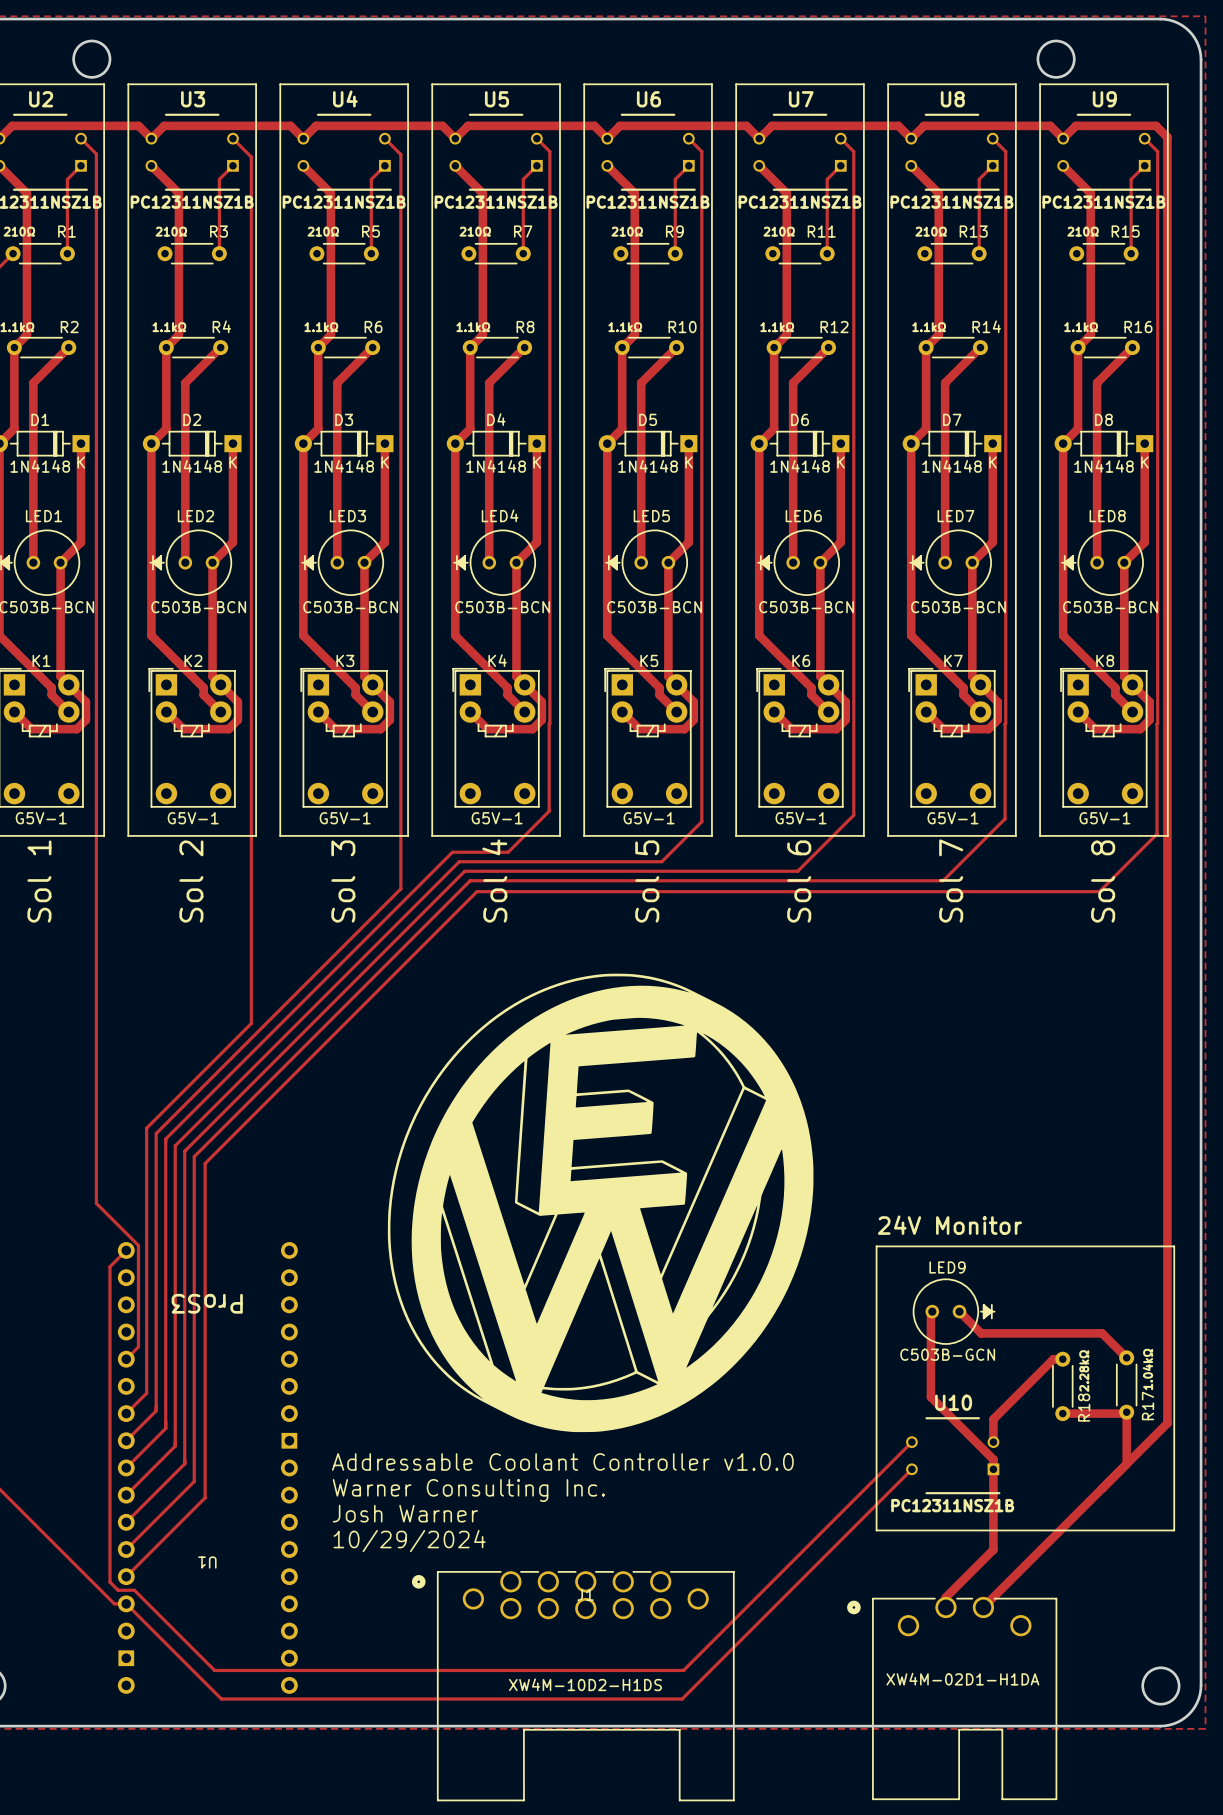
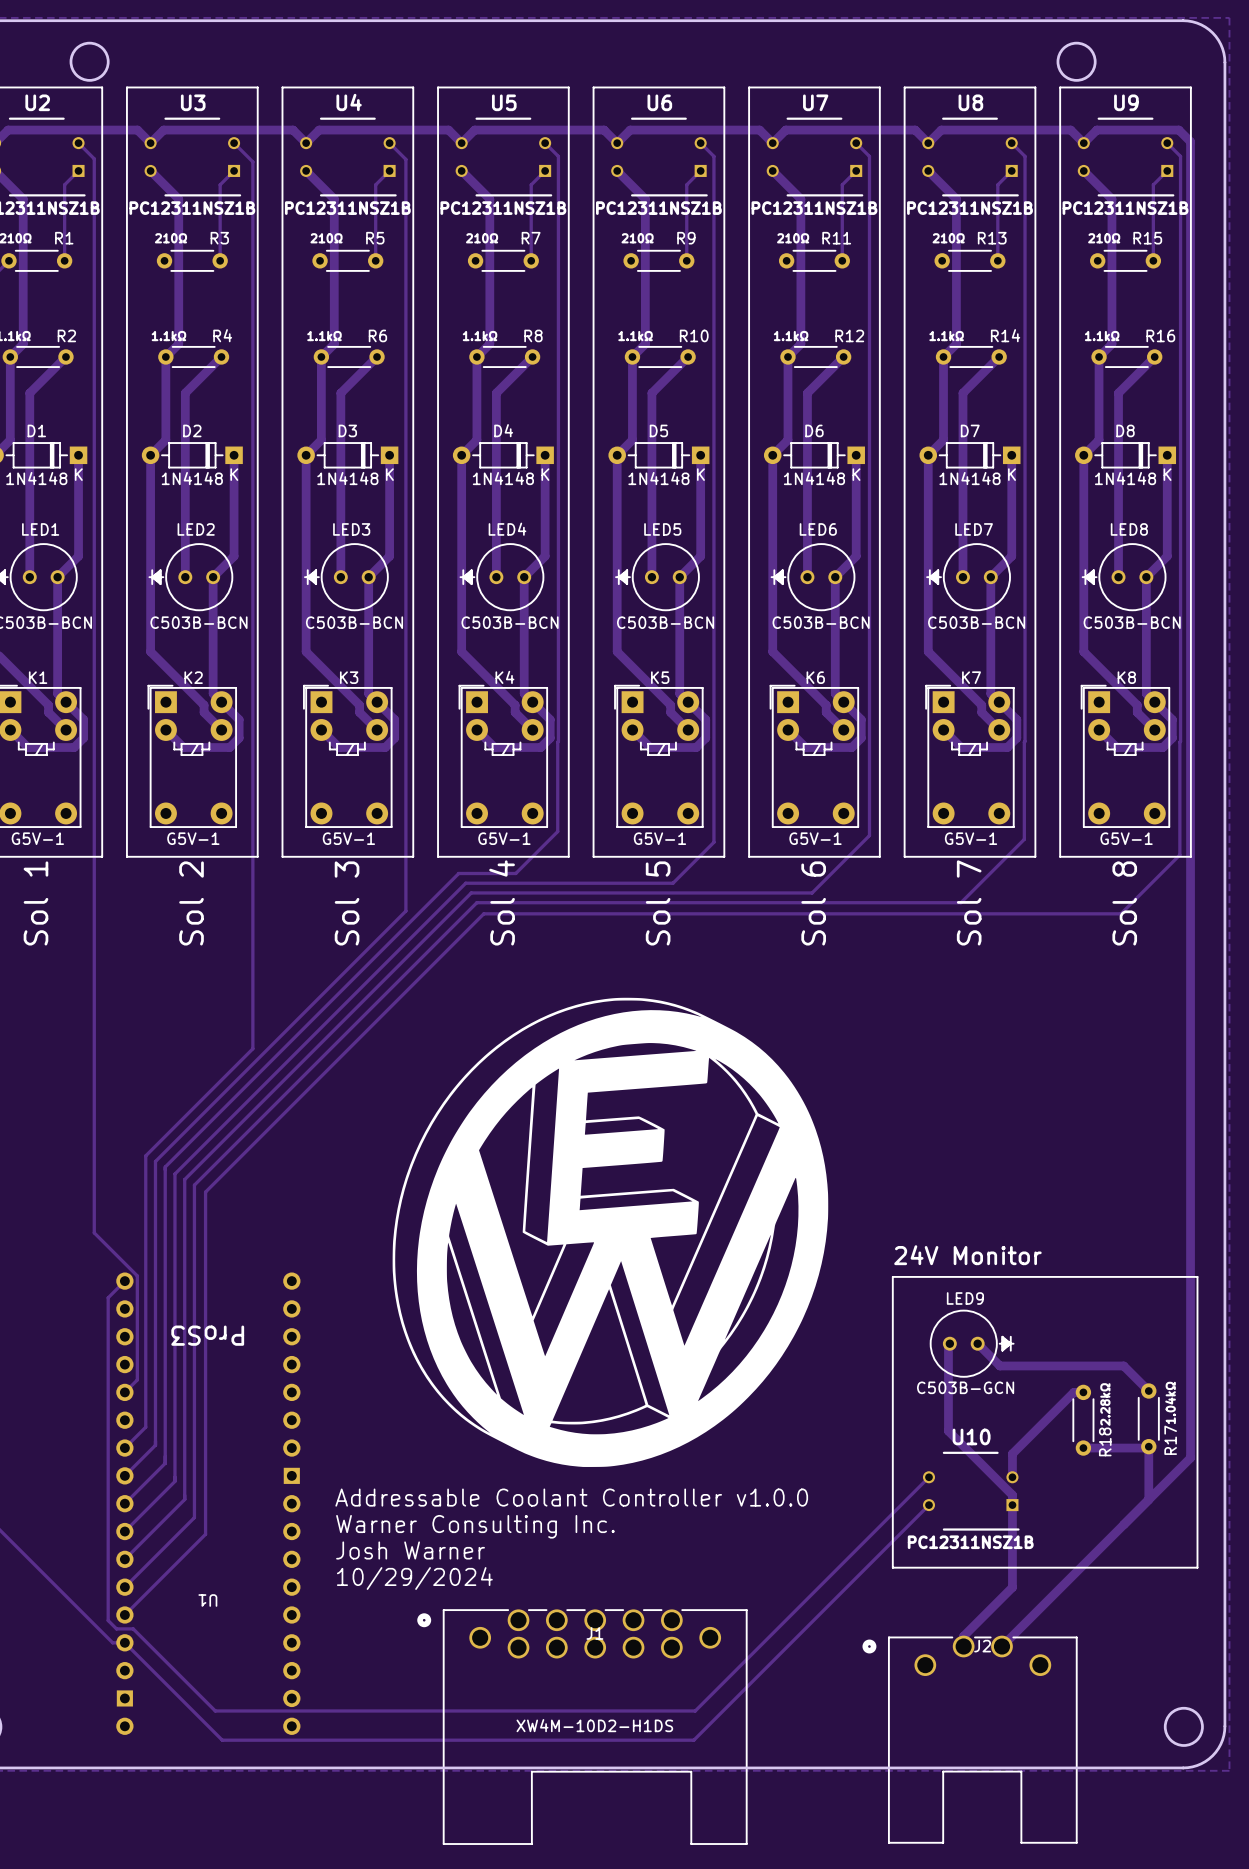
part: XW4M-02D1-H1DA (952, 1698) -> none
J2: none -> (970, 1739)

